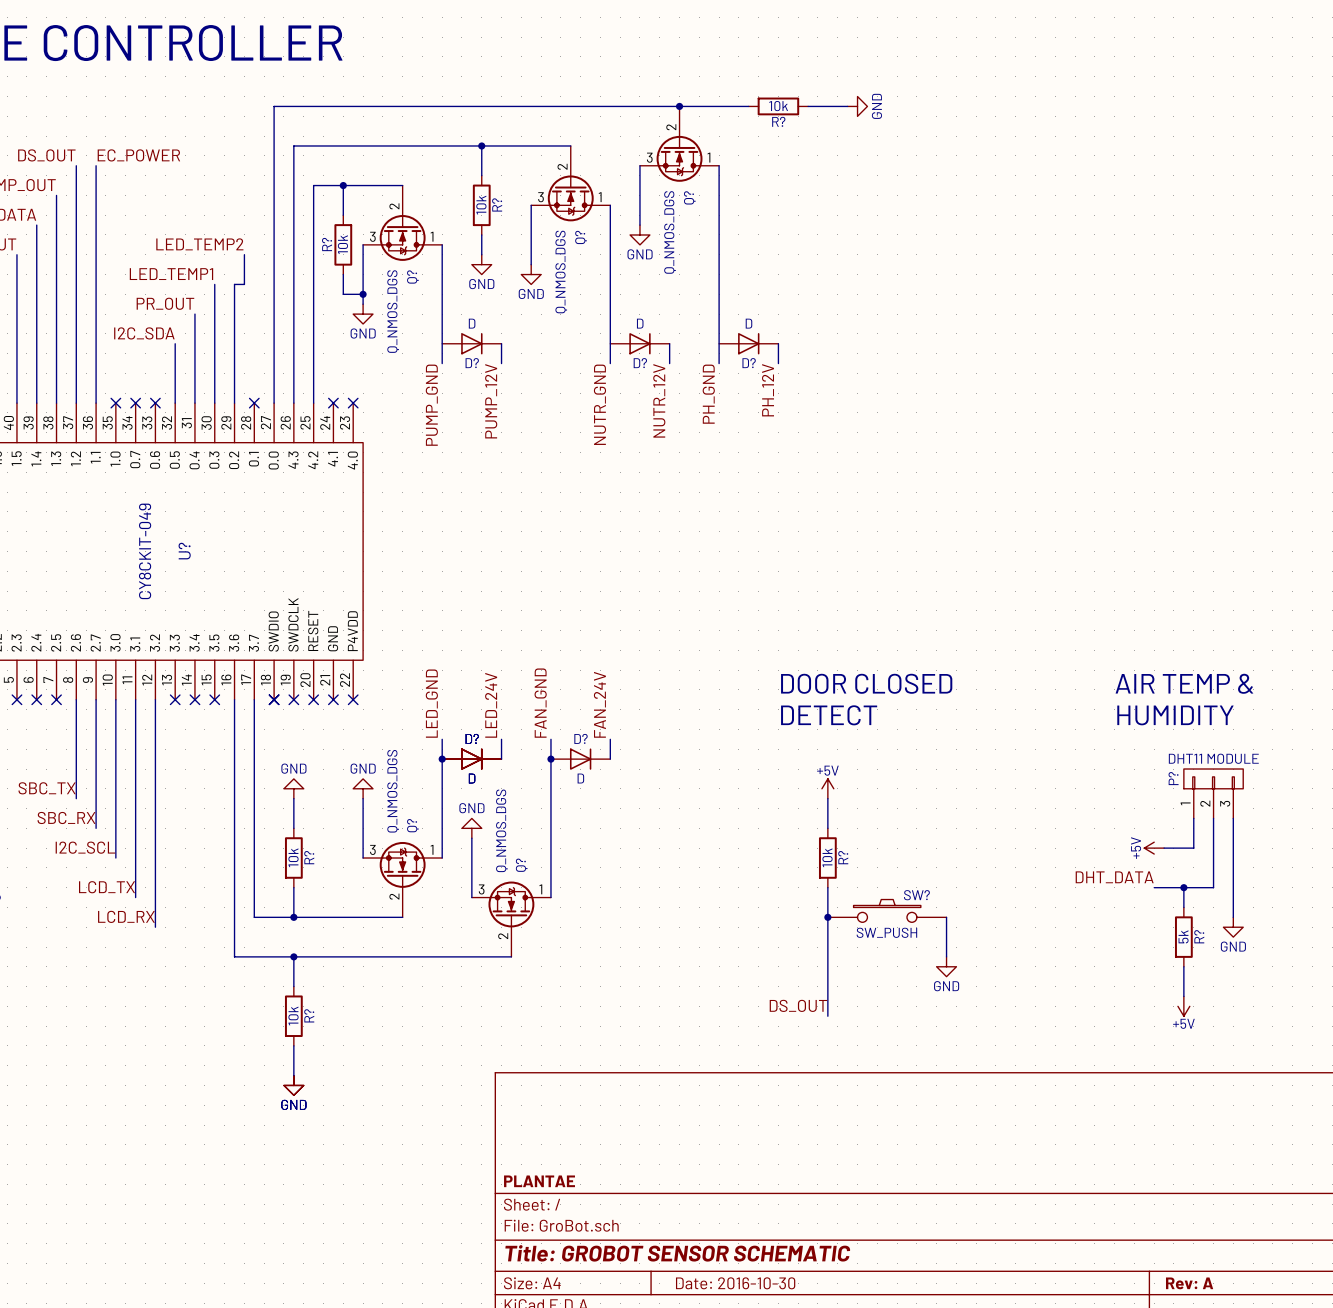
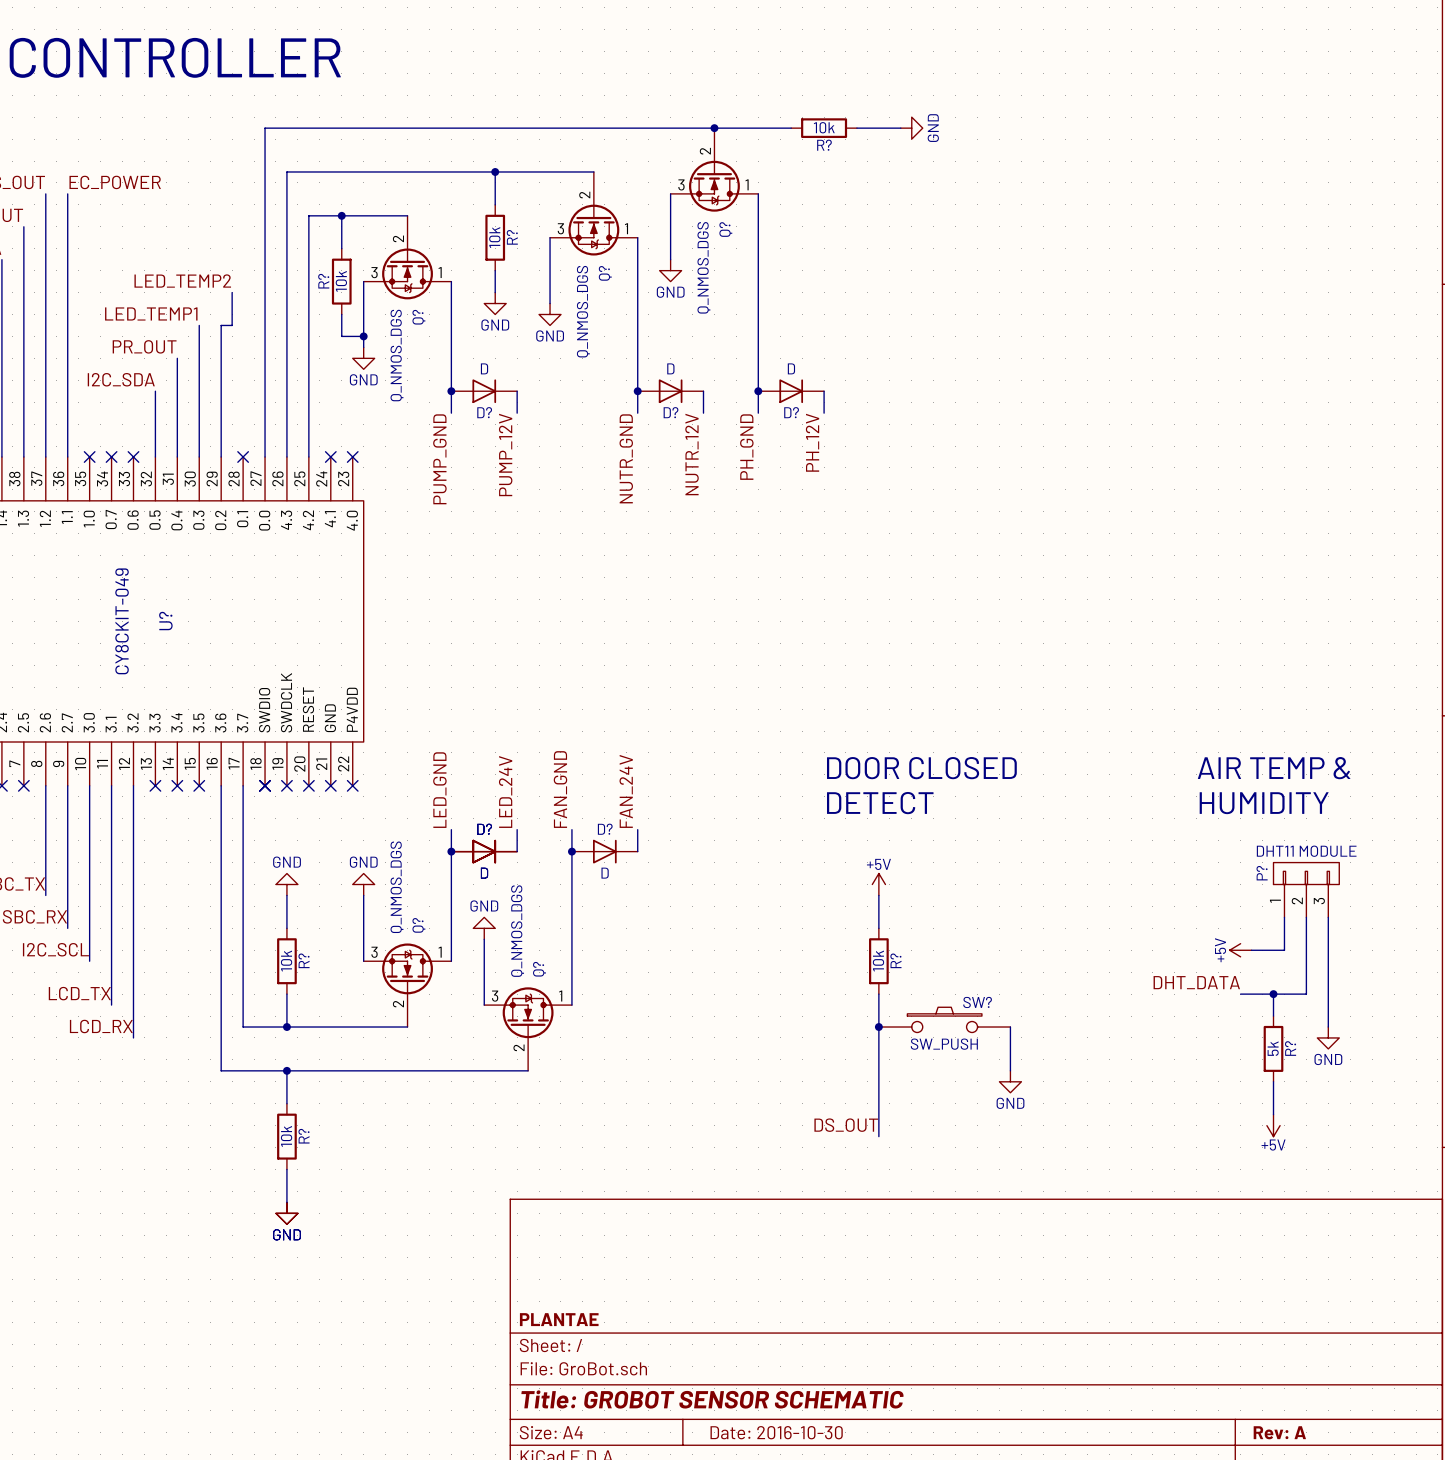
junction: none -> (451, 391)
junction: none -> (637, 391)
junction: none -> (758, 391)

